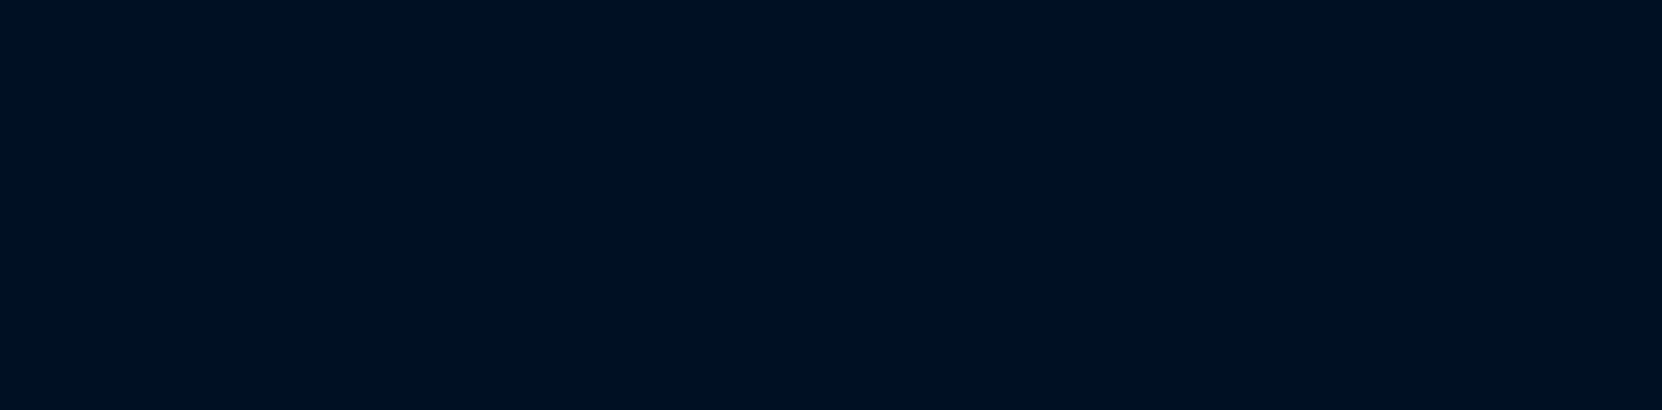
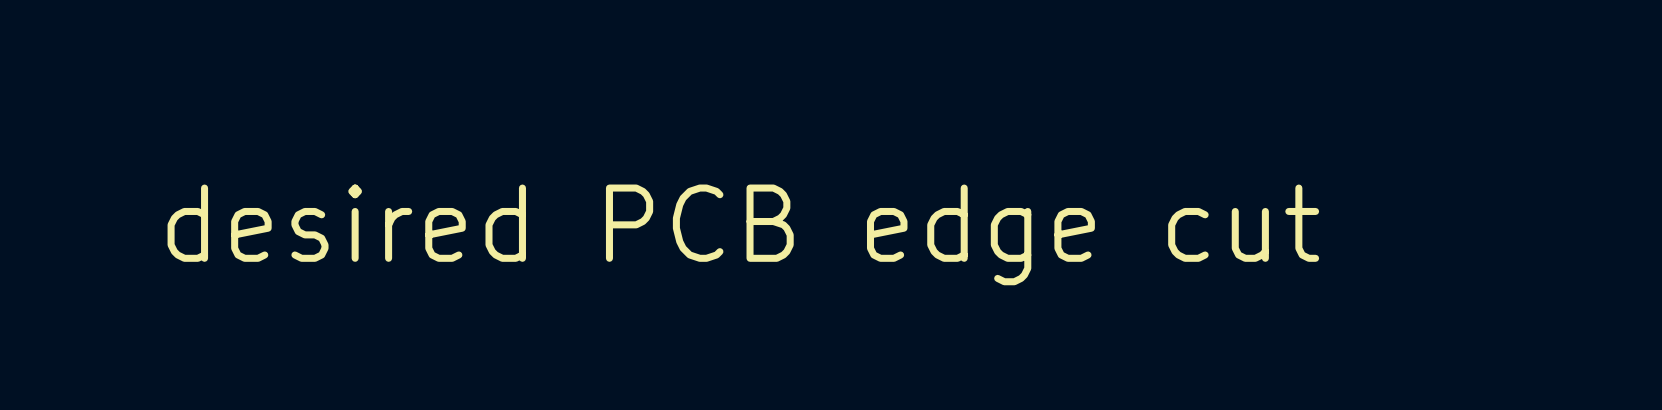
text: none -> desired PCB edge cut (743, 234)

